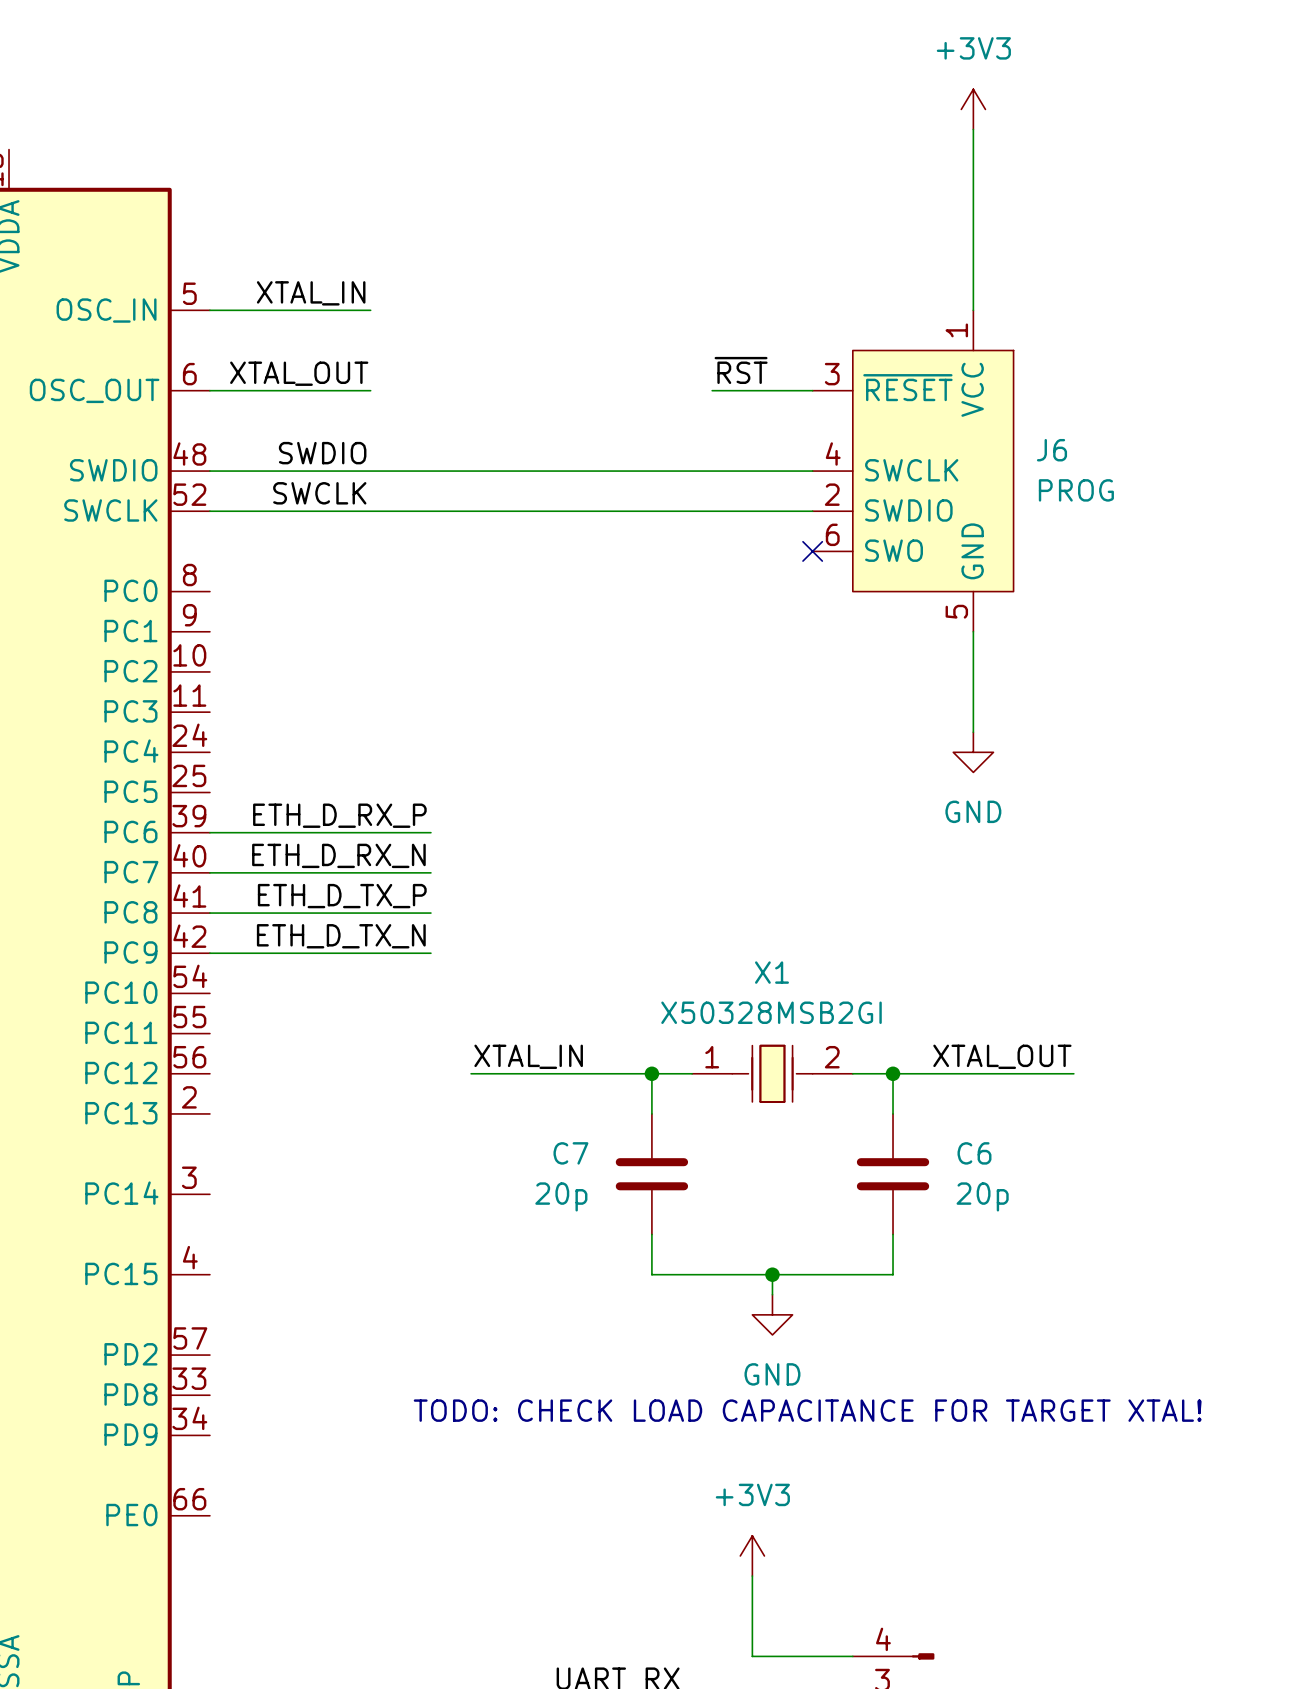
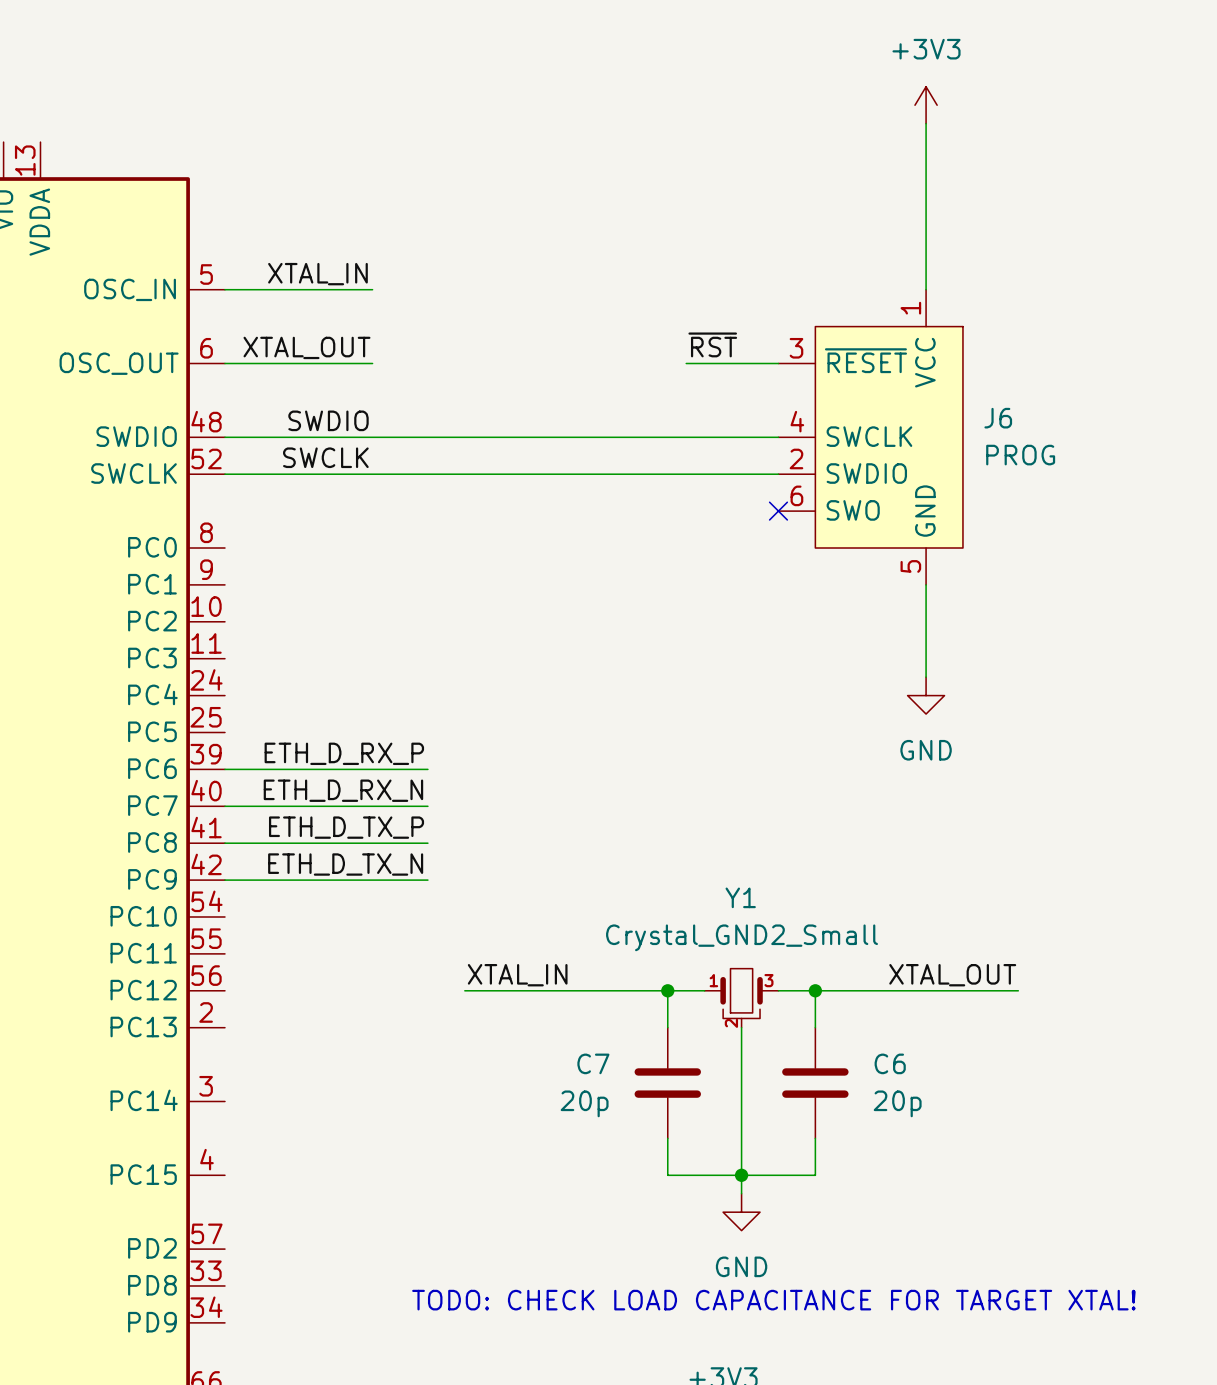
wire: (651, 1073) (651, 1113) -> none
junction position: (651, 1073) -> (667, 990)
wire: none -> (704, 990) (667, 990) (667, 1027)
X1: X50328MSB2GI (772, 1073) -> none
wire: none -> (778, 990) (815, 990) (815, 1027)
wire: (893, 1073) (893, 1113) -> none
junction position: (893, 1073) -> (815, 990)
Y1: none -> Crystal_GND2_Small (741, 998)
wire: none -> (741, 1027) (741, 1175)
C7 position: (651, 1174) -> (667, 1083)
C6 position: (893, 1174) -> (815, 1083)
wire: (651, 1234) (651, 1274) (692, 1274) -> (667, 1138) (667, 1175)
wire: (893, 1234) (893, 1274) (852, 1274) -> (815, 1138) (815, 1175)

